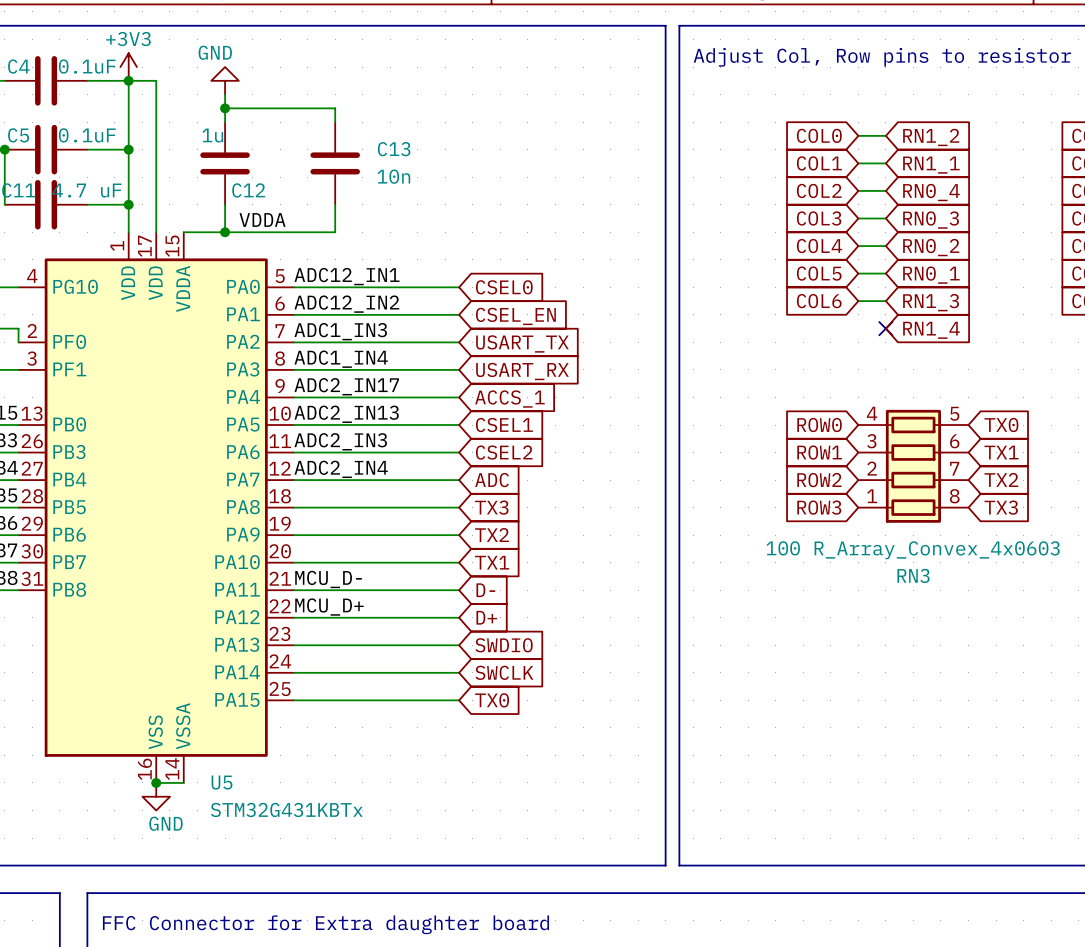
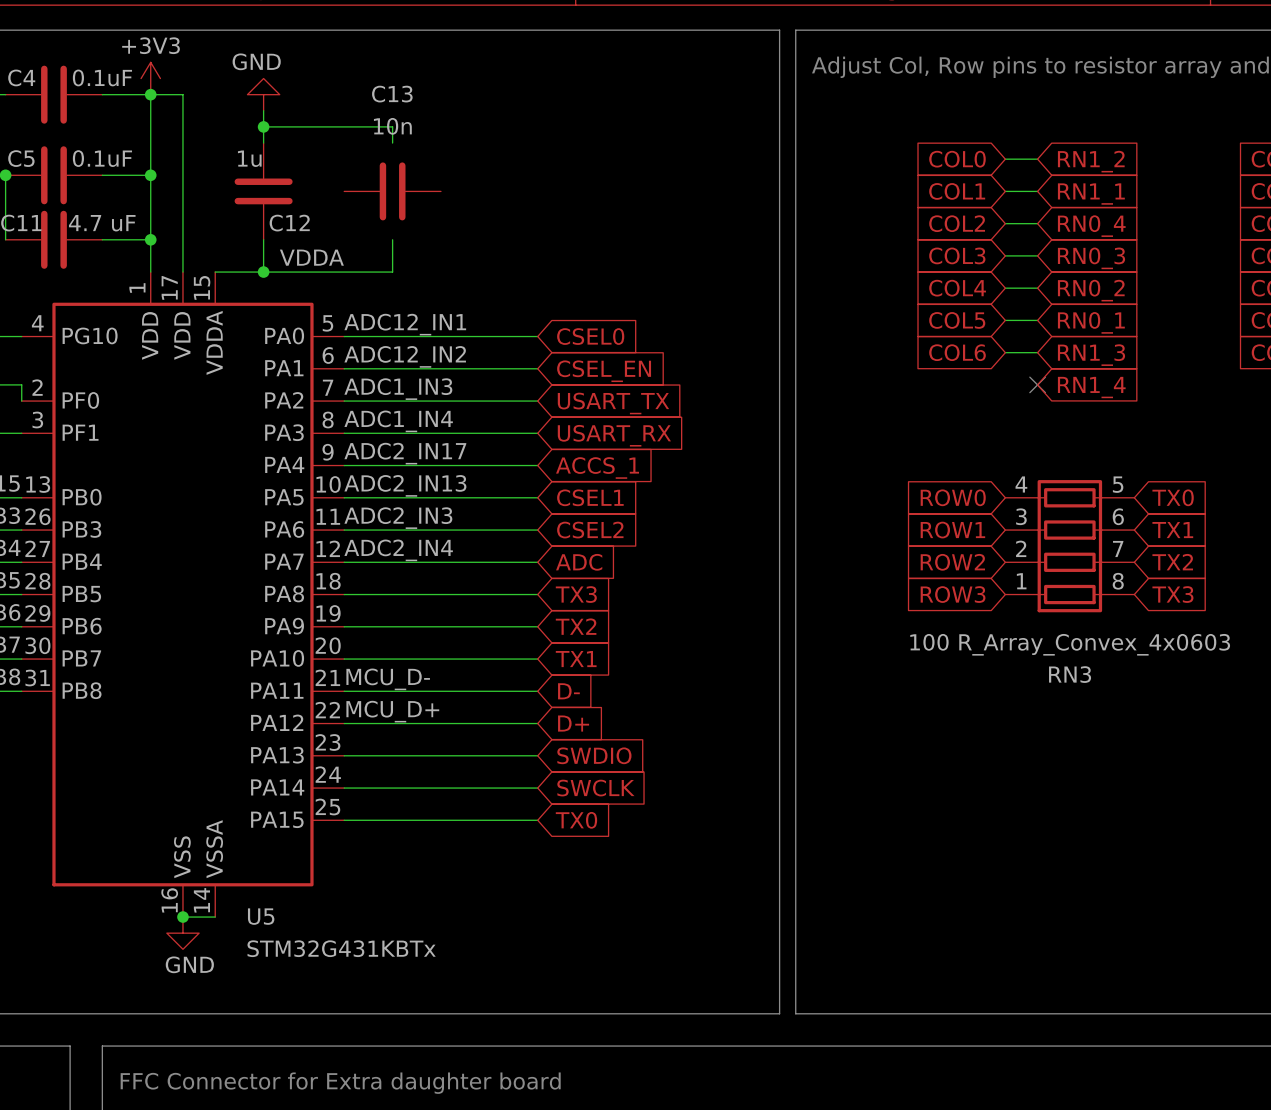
C13 name position: C13 (394, 149) -> C13 (392, 94)
C13 rotation: 0° (335, 163) -> 90° clockwise (392, 191)
C13 value position: 10n (393, 176) -> 10n (392, 126)

